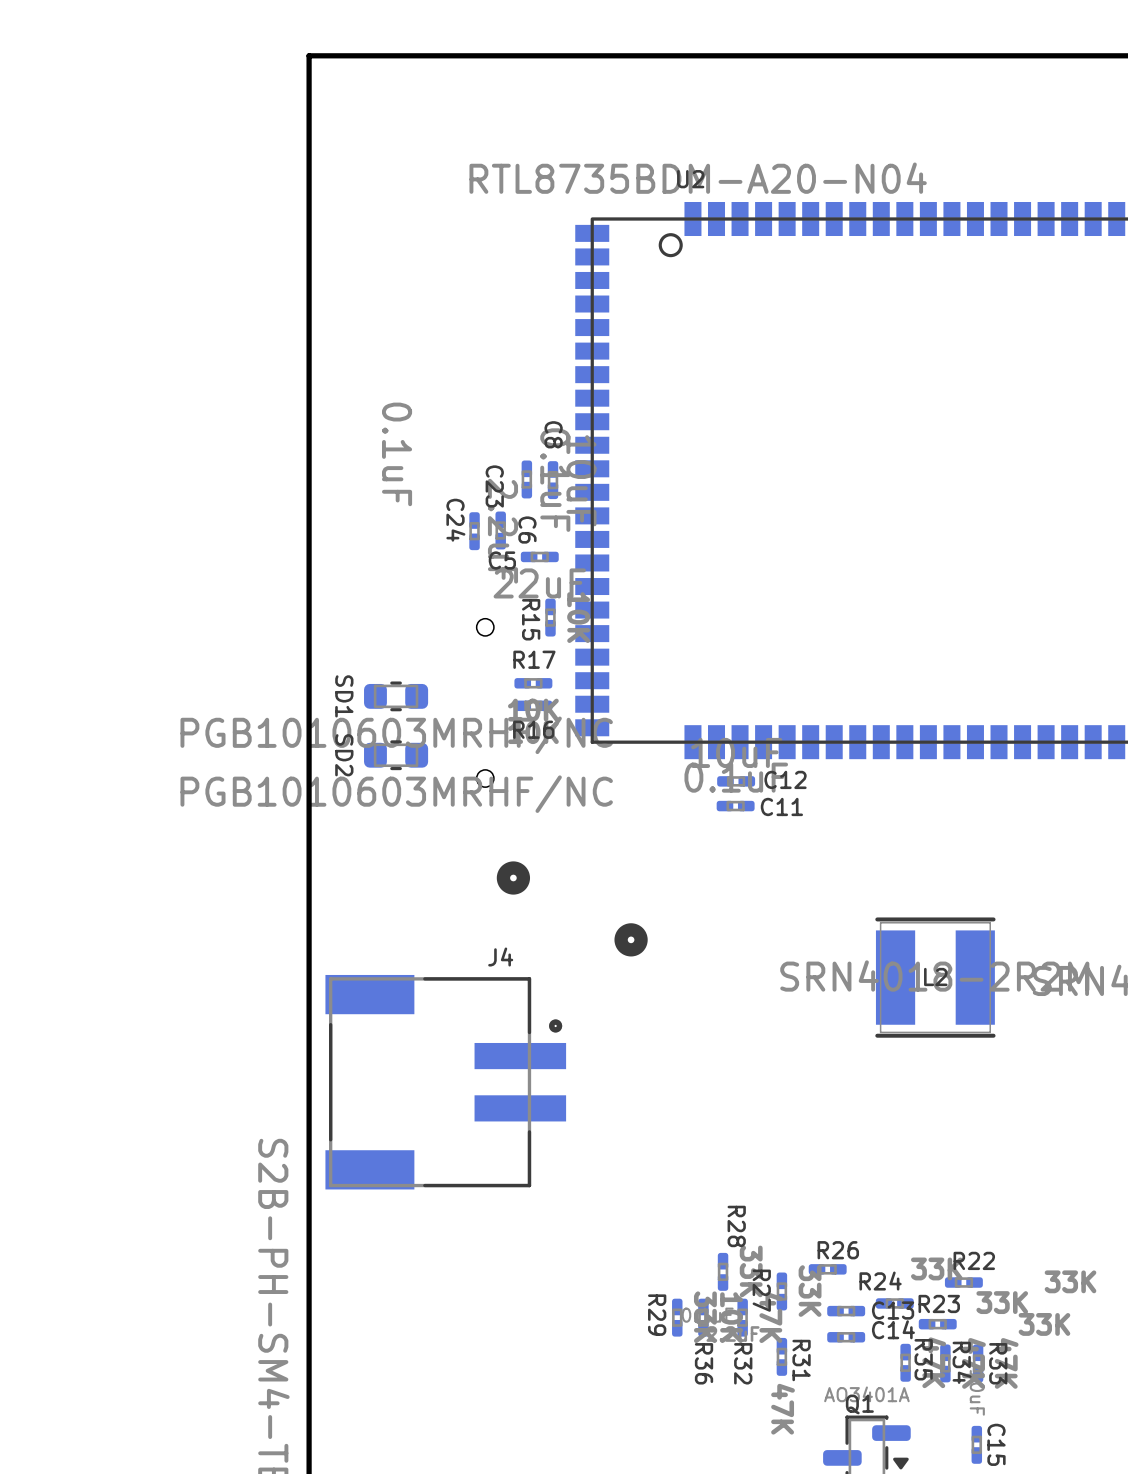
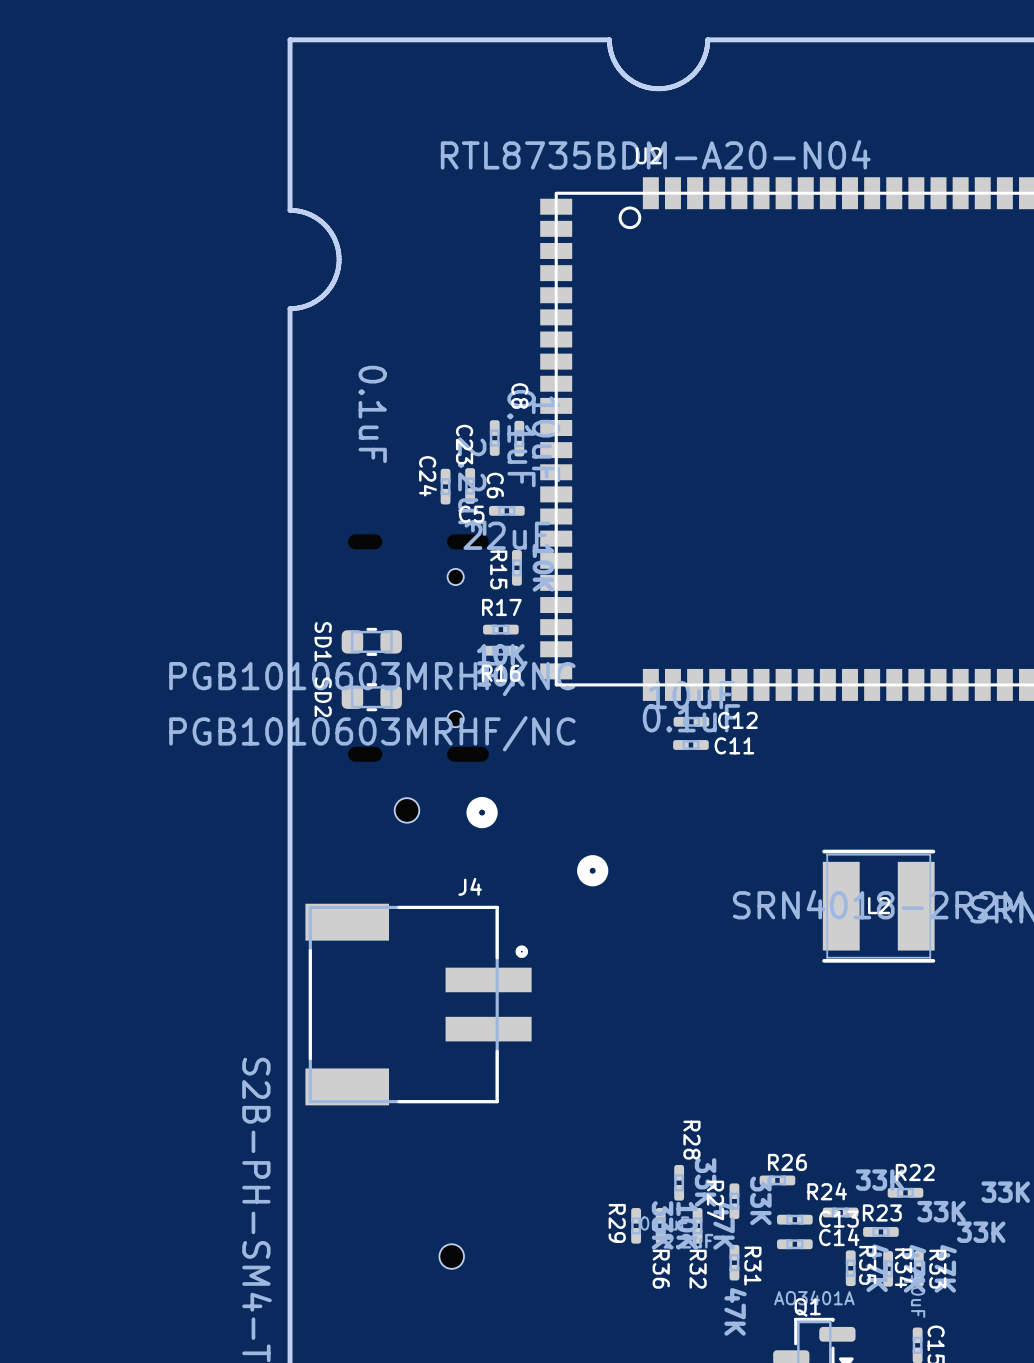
board edge: (753, 55) (648, 55) -> (707, 39) (703, 59) (692, 75) (676, 85) (658, 88) (640, 85) (624, 75) (613, 59) (609, 39)
board edge: (309, 237) (309, 341) -> (290, 210) (310, 214) (325, 225) (335, 241) (339, 259) (335, 277) (325, 293) (310, 304) (290, 308)
part: none -> (407, 810)
part: none -> (451, 1256)

